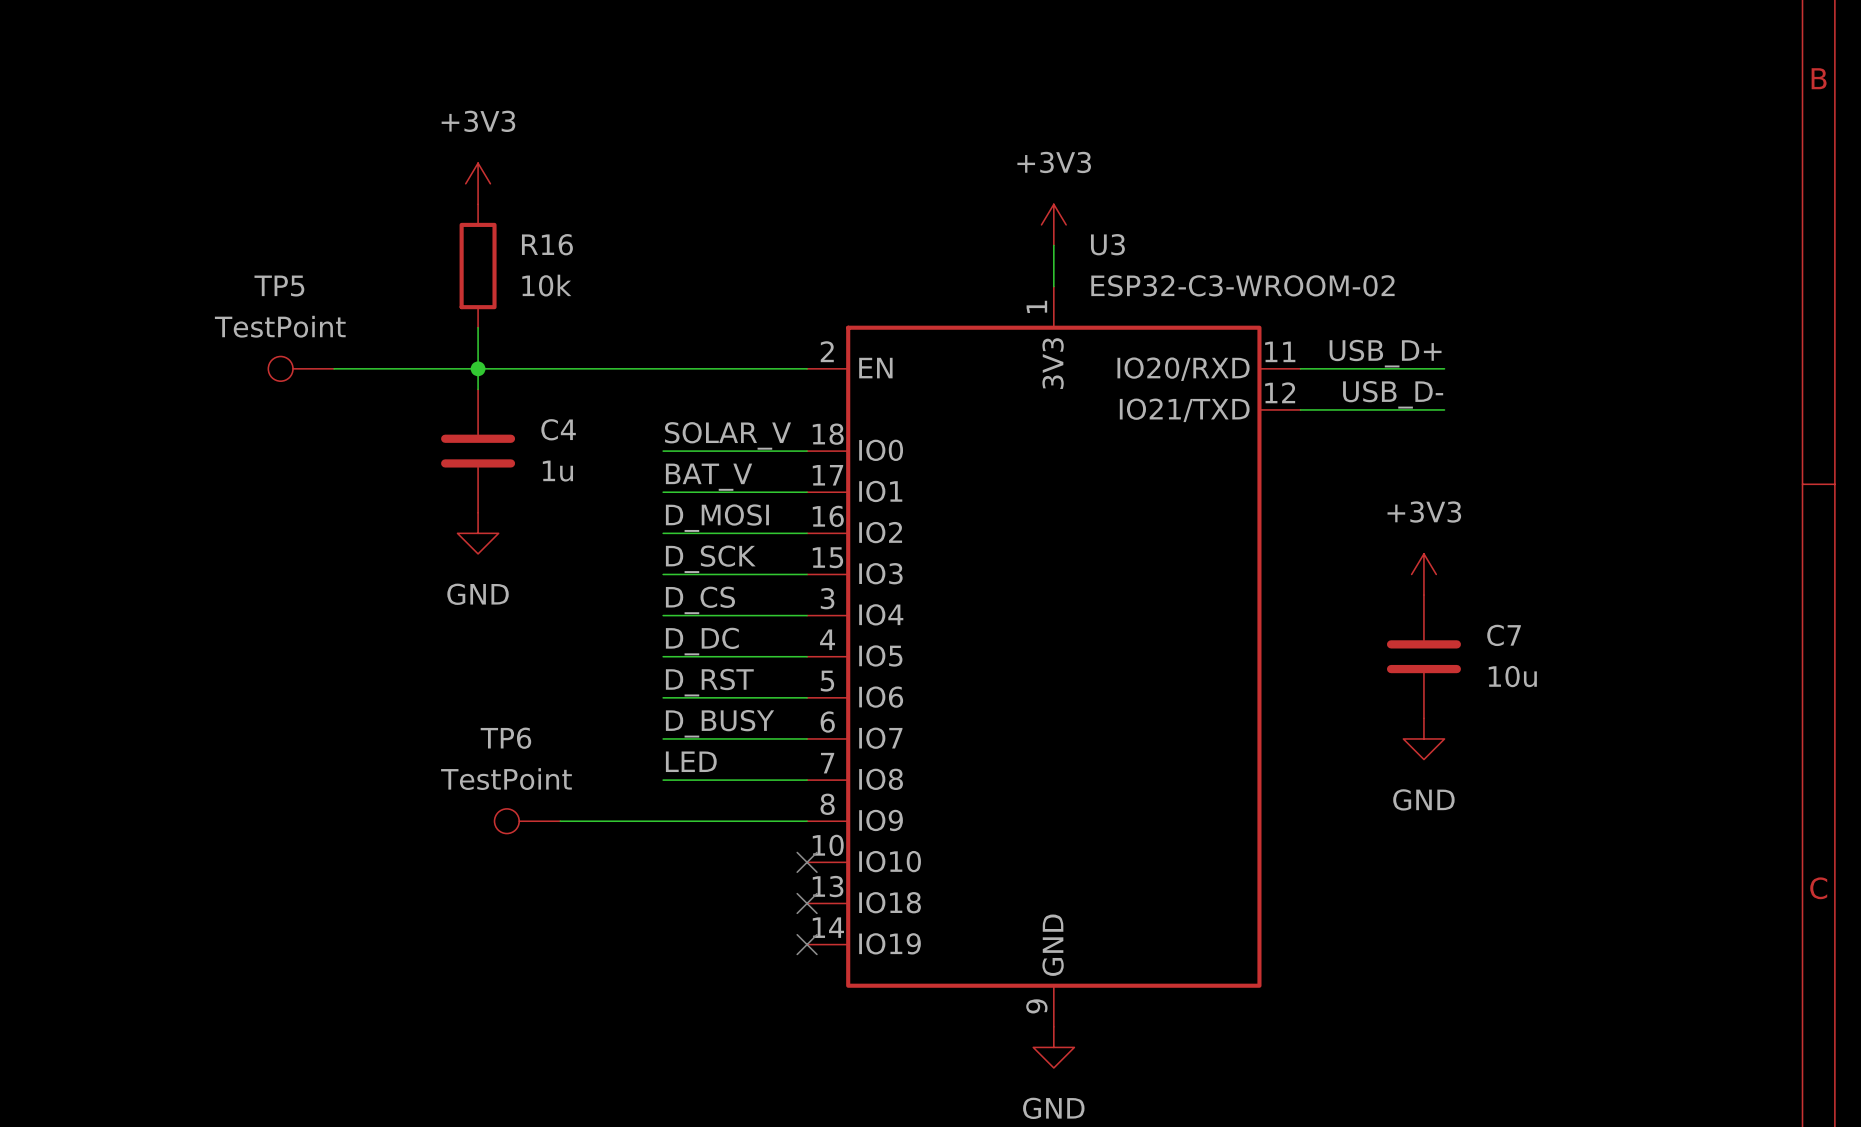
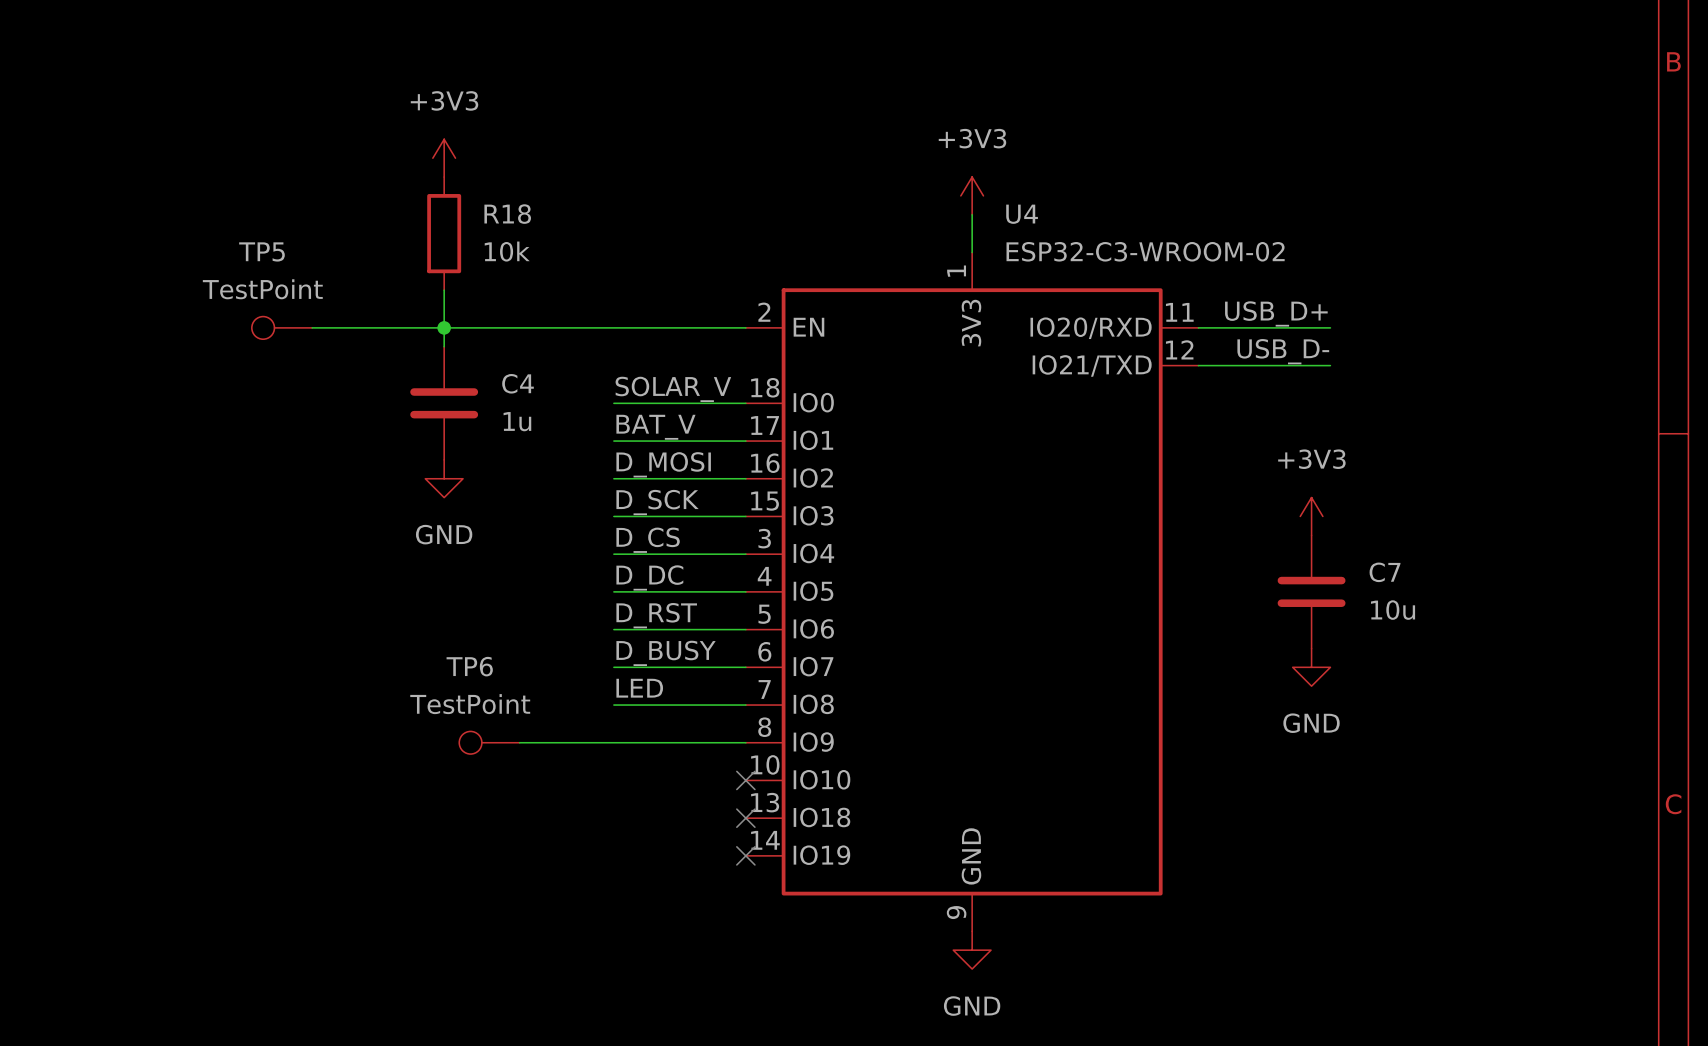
R16 name: R16 (547, 244) -> R18 (507, 214)
U3 name: U3 (1107, 244) -> U4 (1022, 214)

